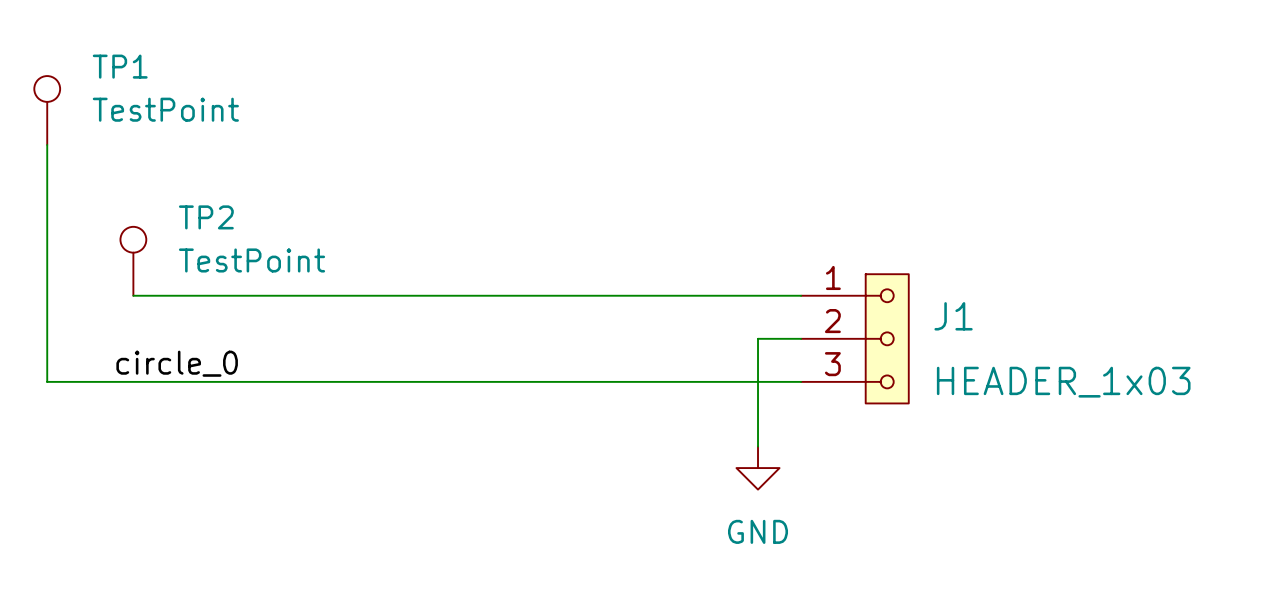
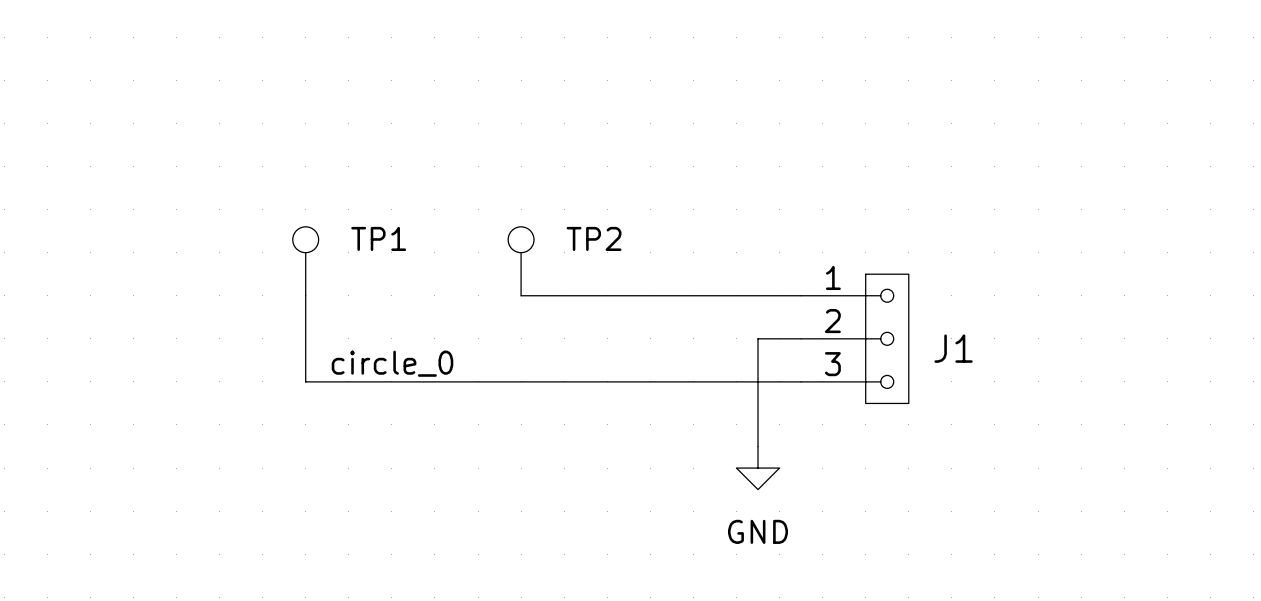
TP1 name position: TP1 (120, 66) -> TP1 (378, 238)
TP1 value: TestPoint (165, 109) -> none
TP1 position: (47, 110) -> (305, 261)
wire: (47, 144) (47, 381) (305, 381) -> (305, 295) (305, 381)
TP2 name position: TP2 (206, 217) -> TP2 (594, 238)
TP2 value: TestPoint (252, 260) -> none
TP2 position: (133, 261) -> (521, 261)
wire: (133, 295) (521, 295) -> none
J1 name position: J1 (953, 316) -> J1 (953, 348)
label position: circle_0 (177, 363) -> circle_0 (392, 363)
J1 value: HEADER_1x03 (1063, 382) -> none

